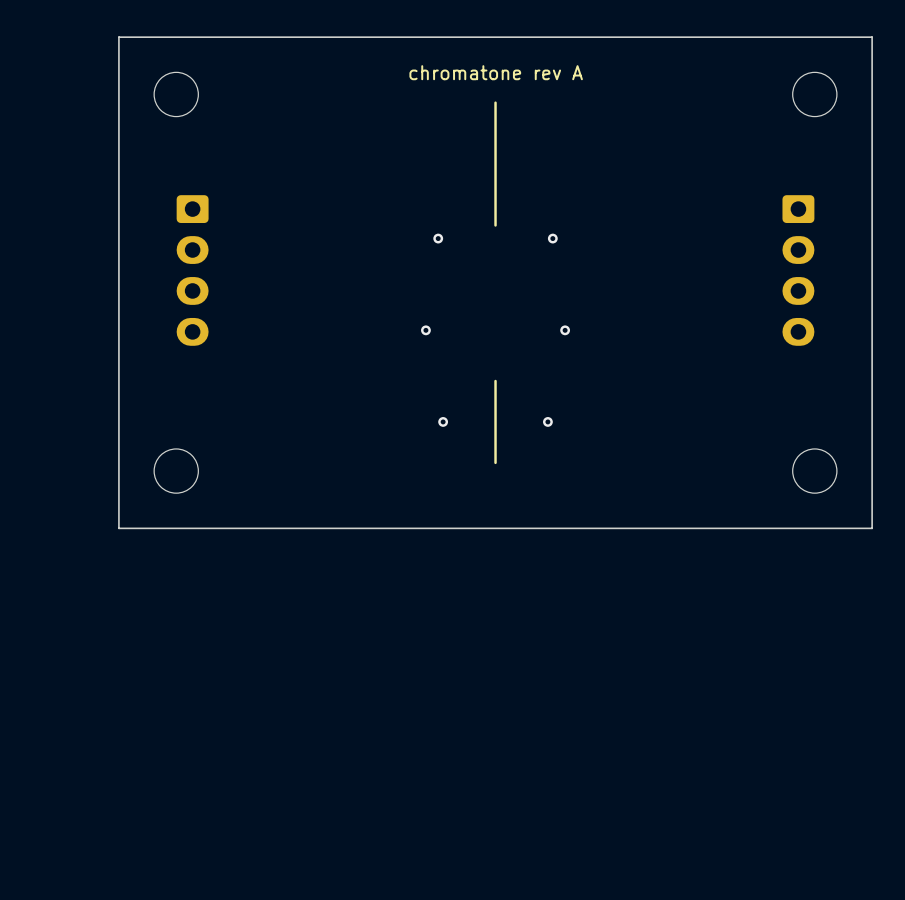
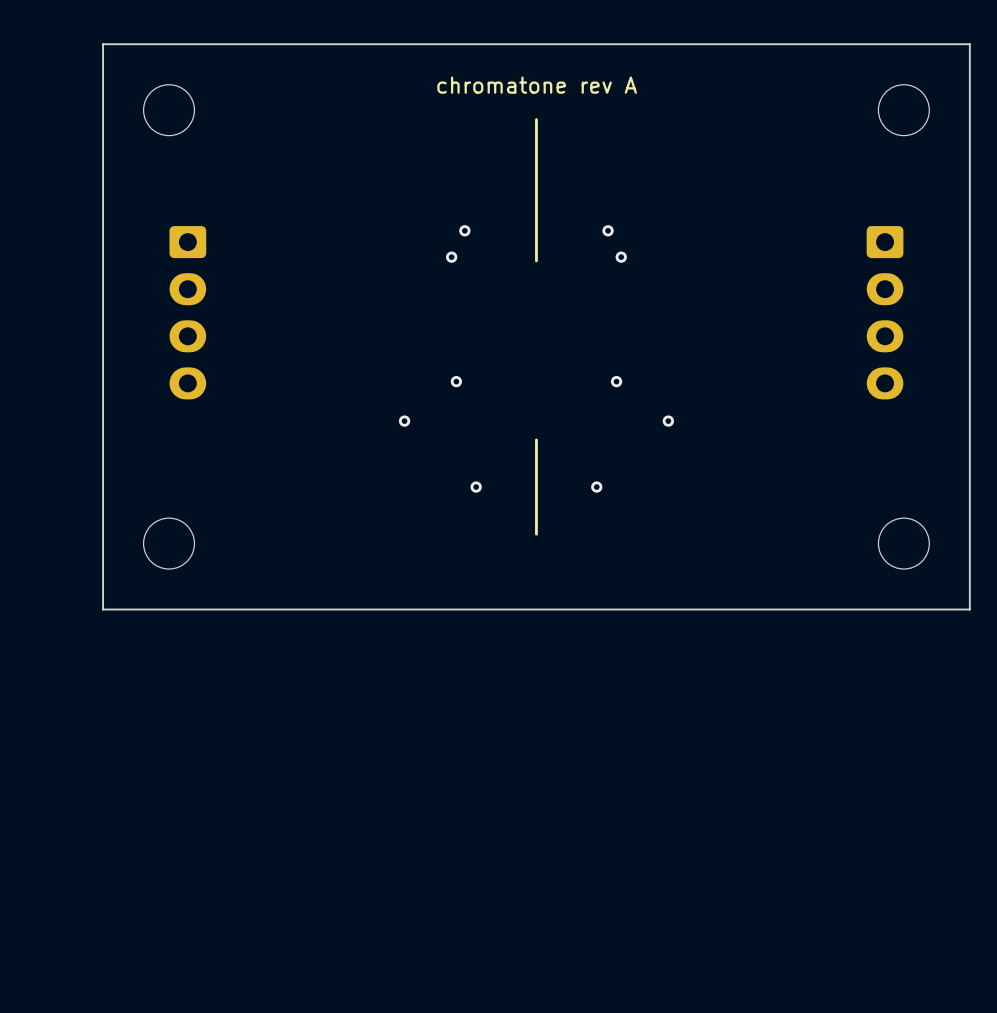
via: none -> (464, 230)
via: none -> (608, 230)
via: none -> (451, 257)
via: none -> (621, 257)
via: (438, 238) -> none
via: (552, 238) -> none
via: none -> (404, 421)
via: none -> (668, 421)

